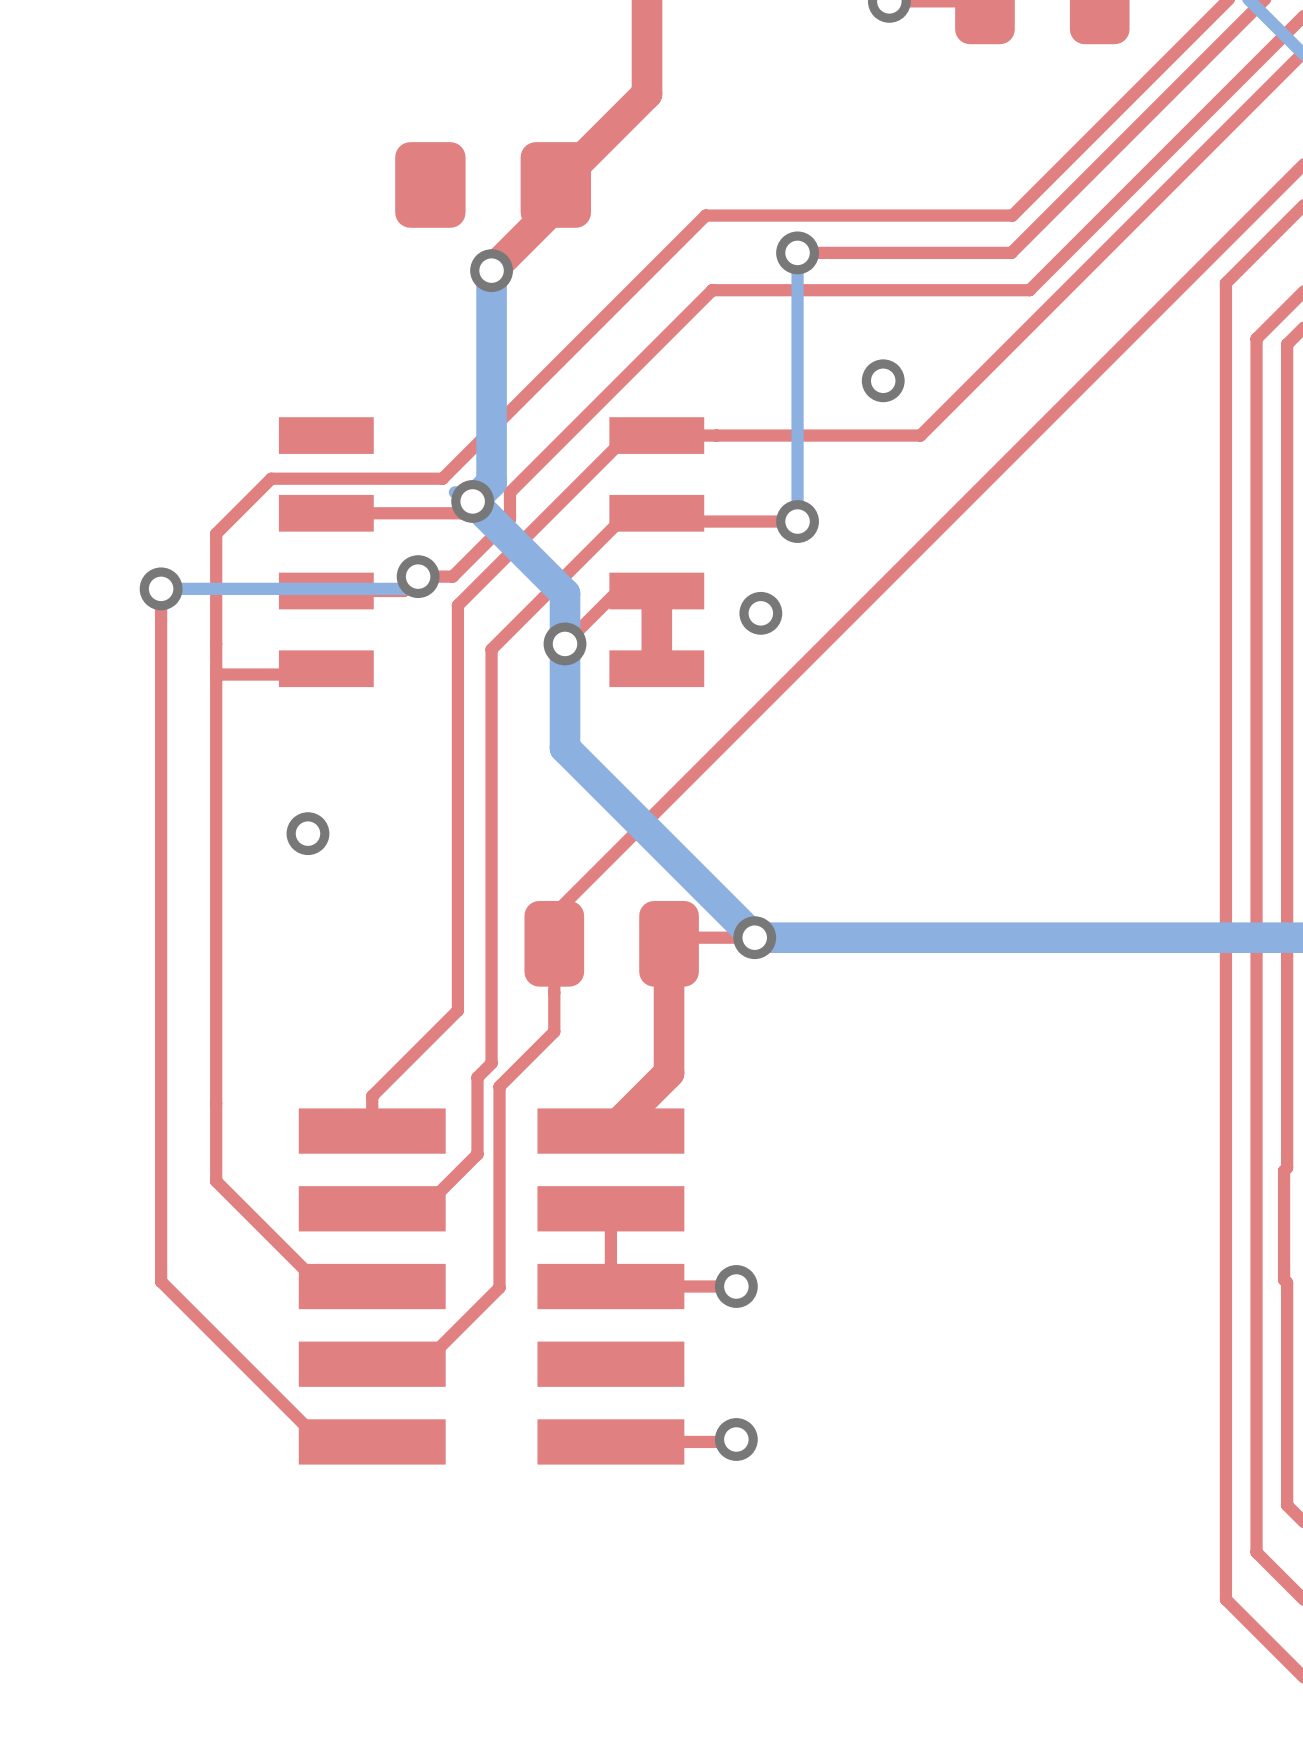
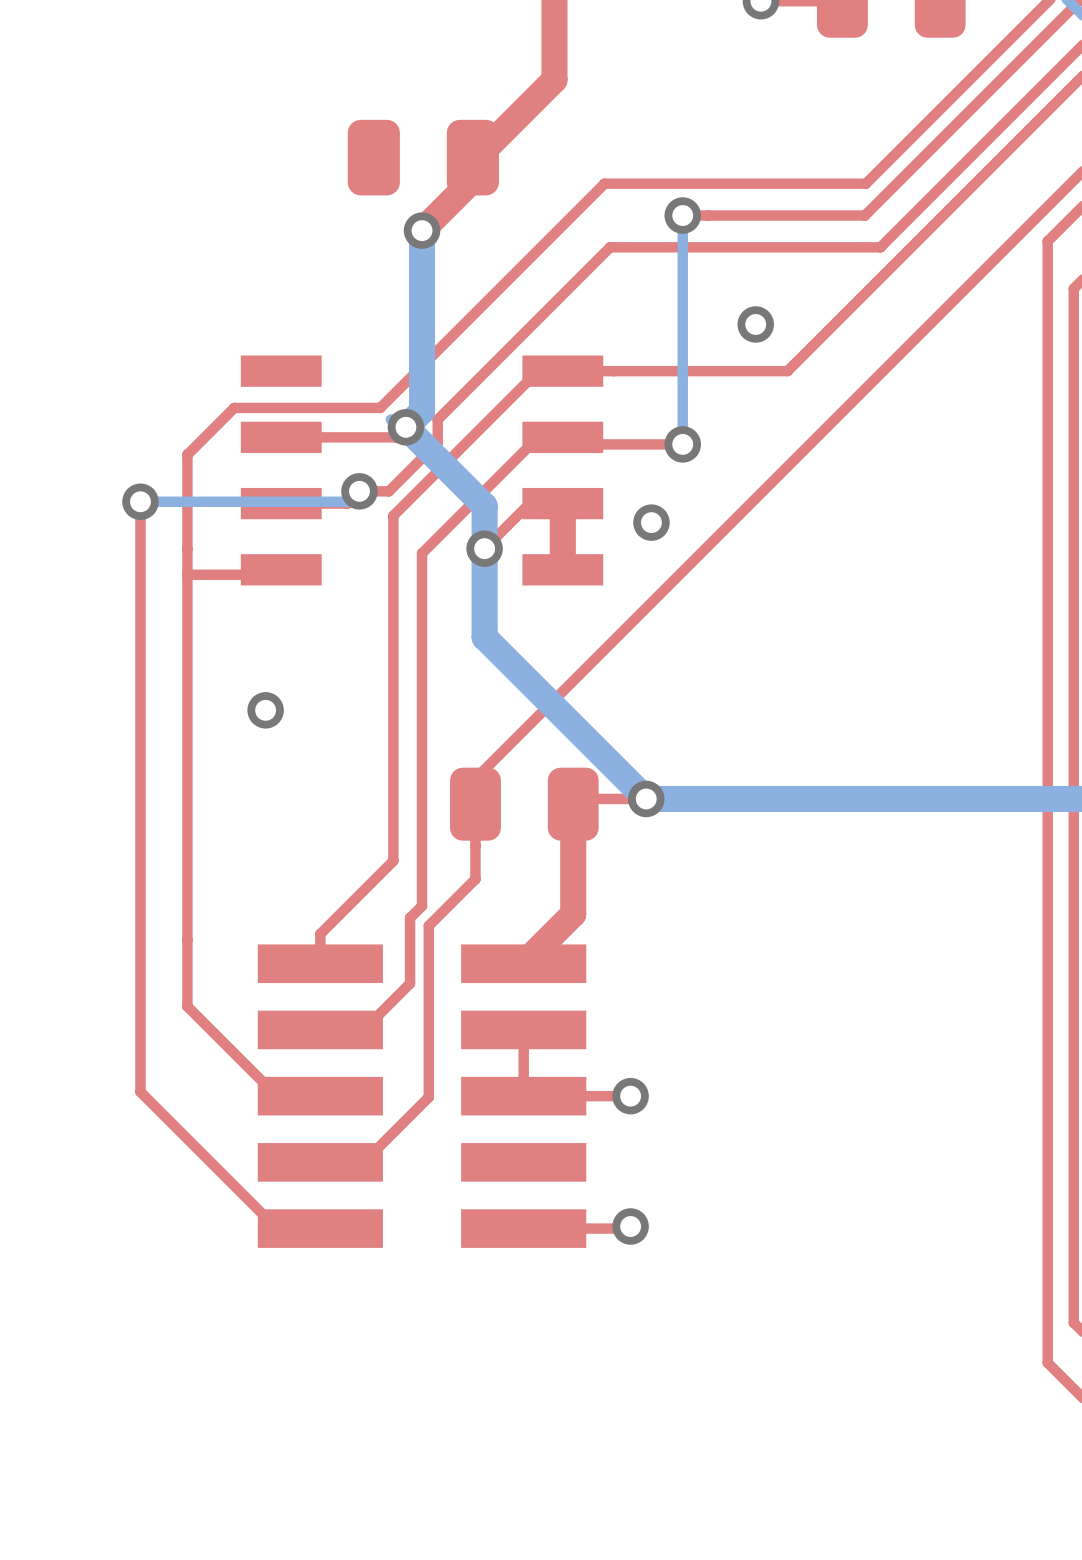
part footprint: [395, 142, 592, 228] -> [347, 119, 499, 196]

